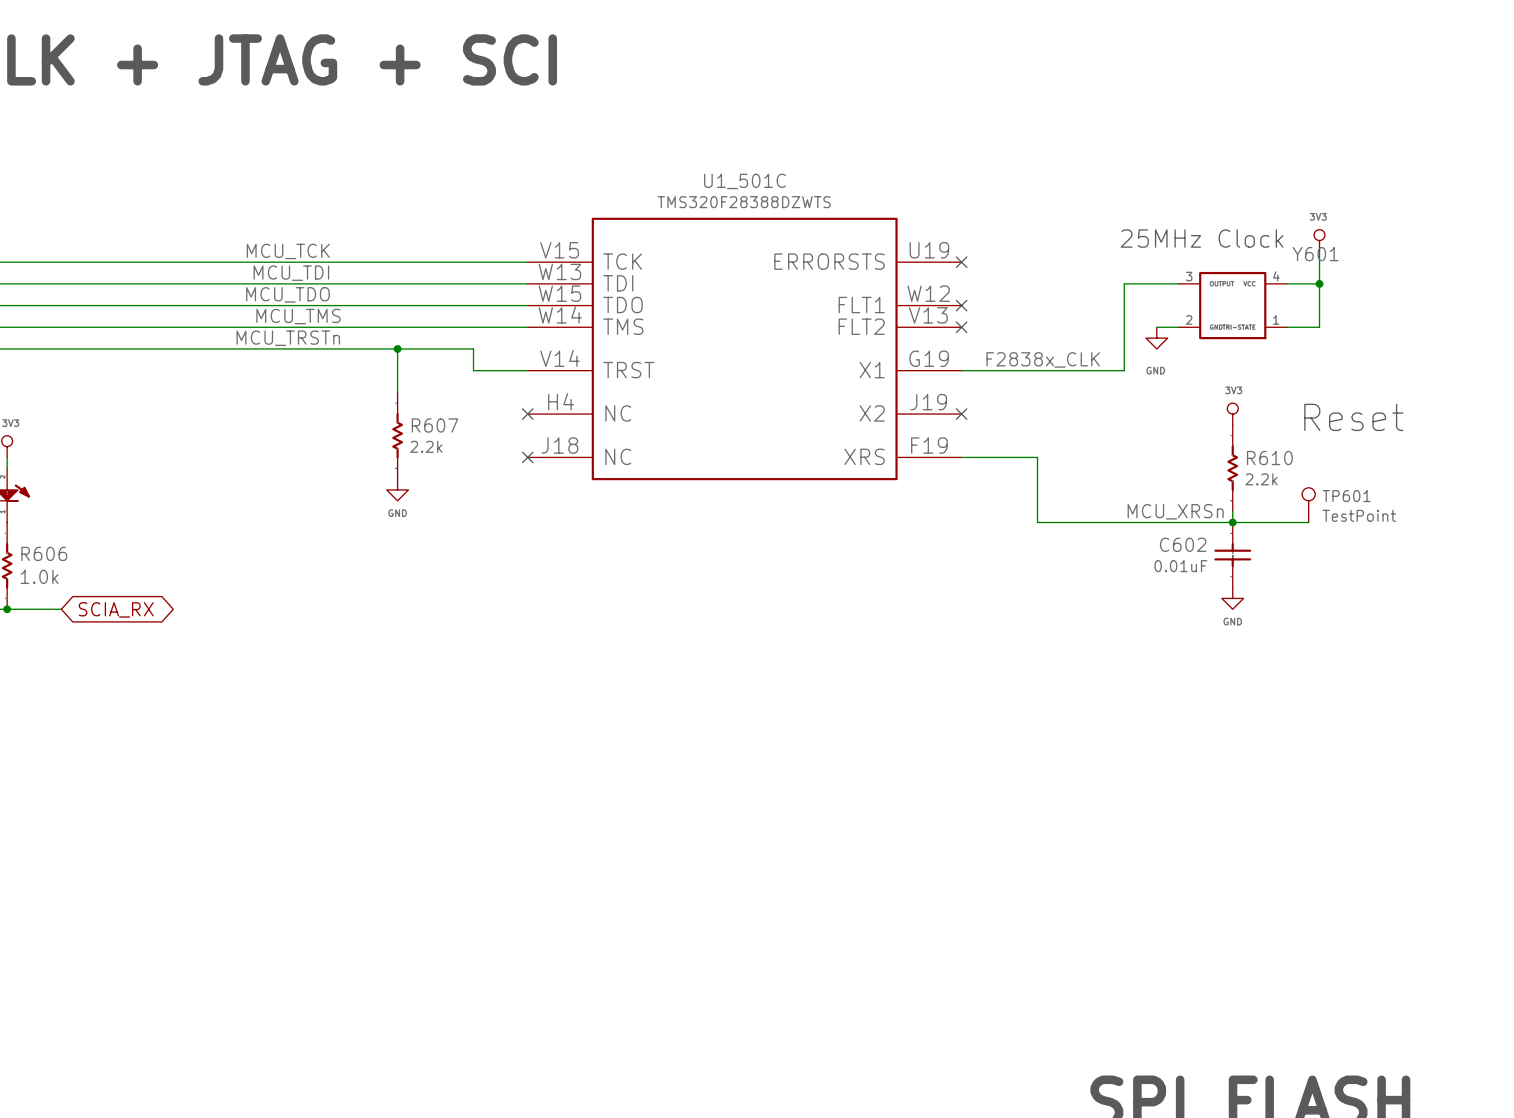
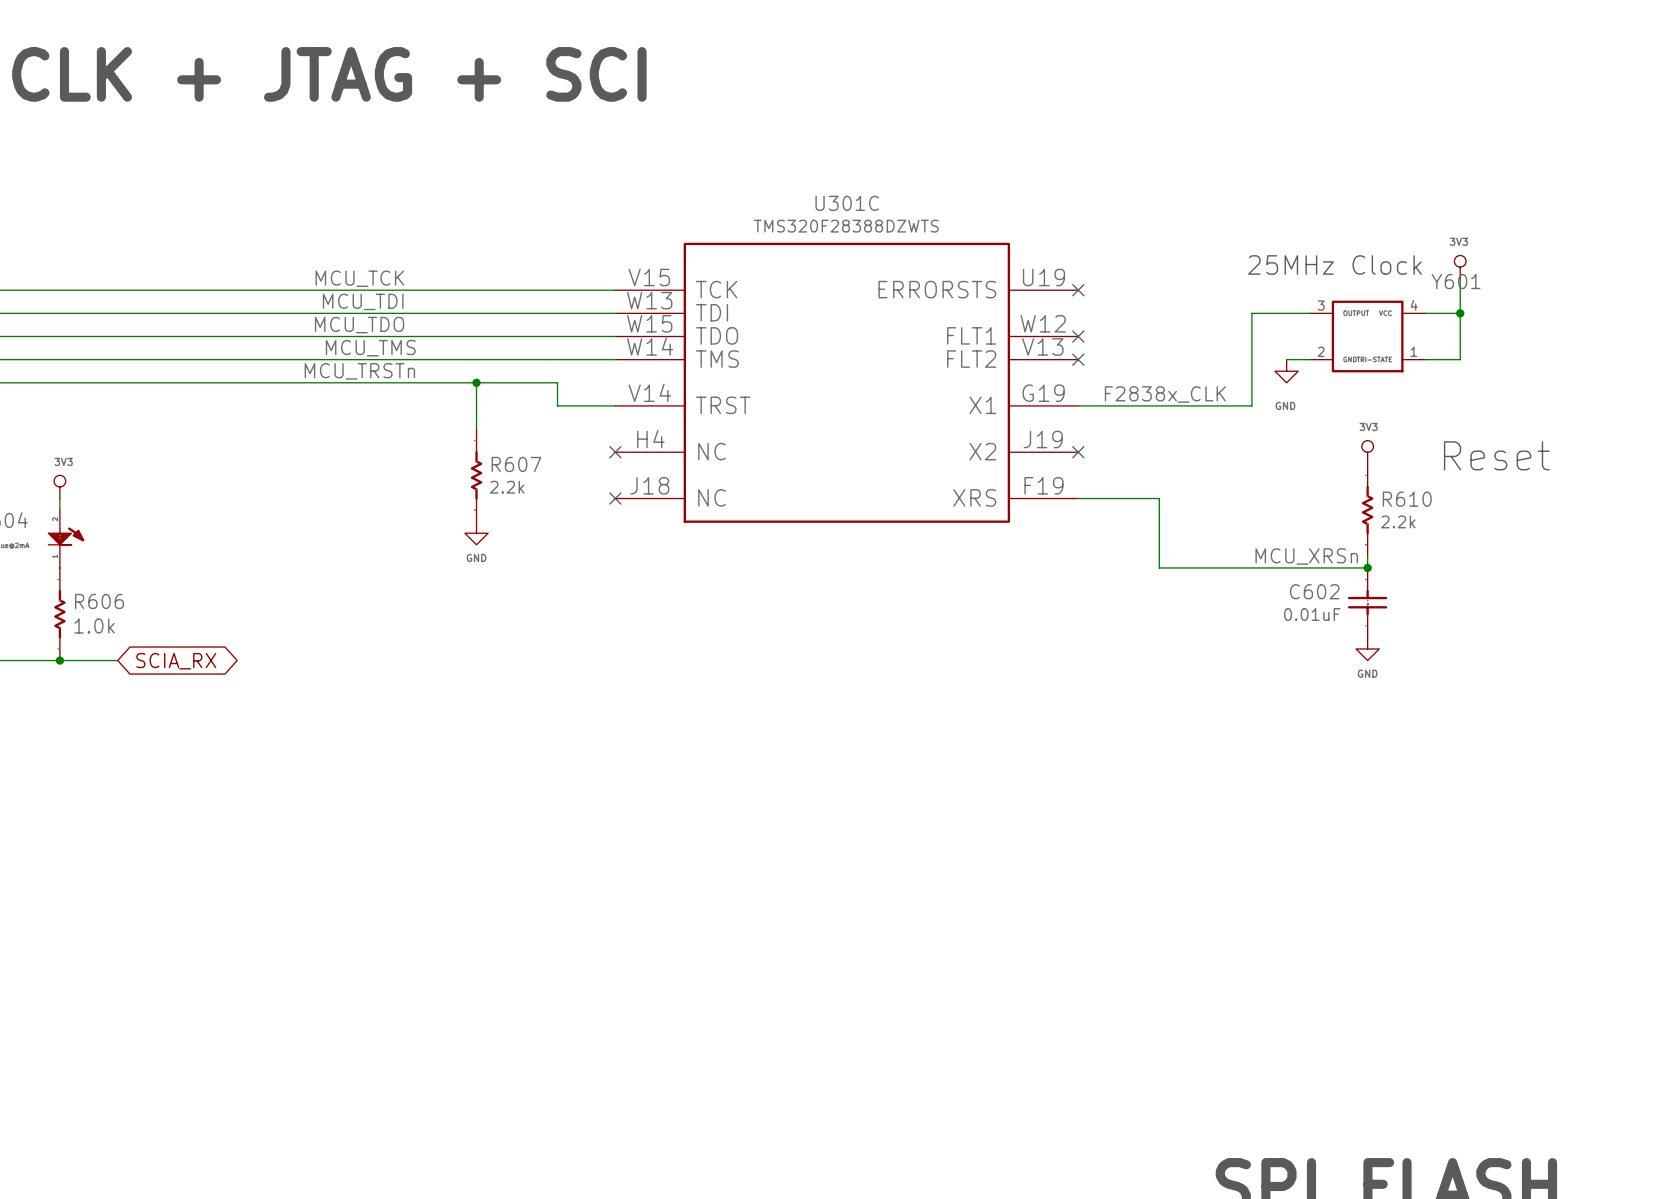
U1_501C name: U1_501C (744, 181) -> U301C (847, 203)
TP601: TestPoint (1308, 505) -> none
wire: (1232, 522) (1308, 522) -> none

